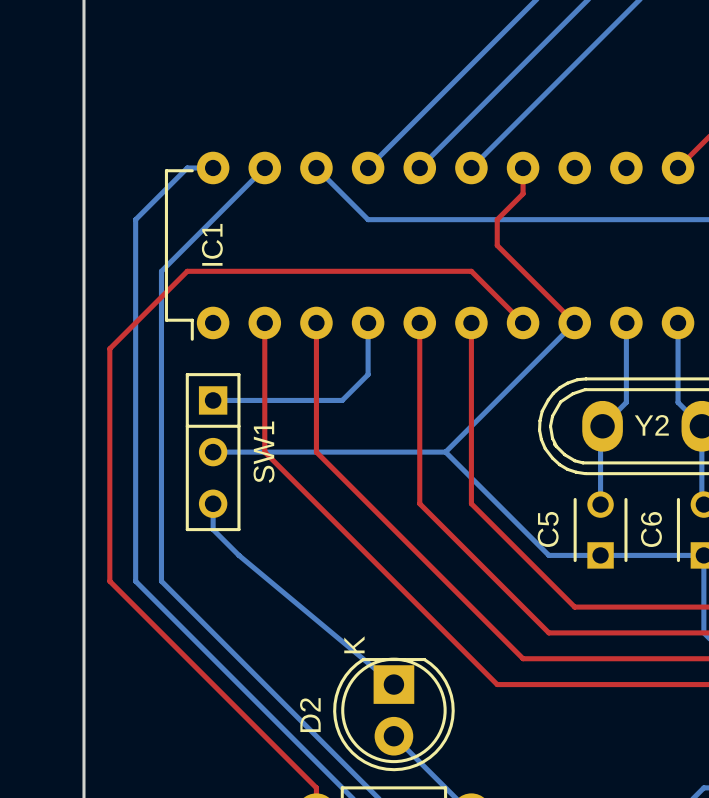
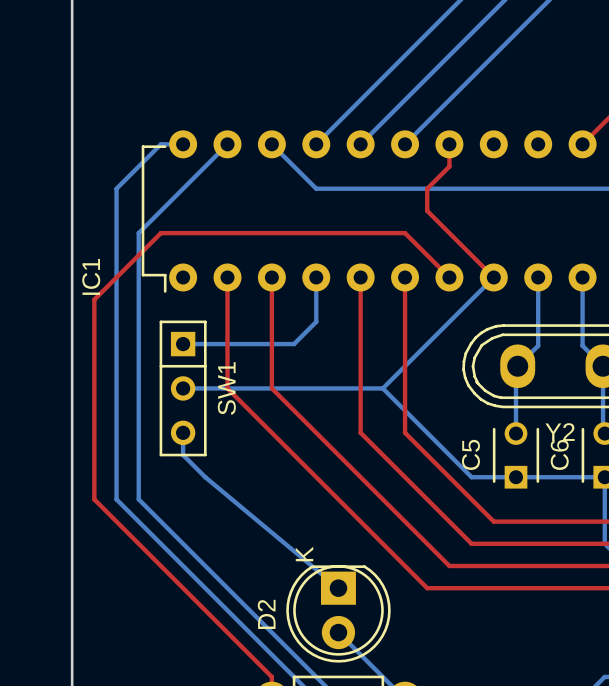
IC1 name position: IC1 (212, 244) -> IC1 (91, 276)
Y2 name position: Y2 (651, 425) -> Y2 (560, 432)

